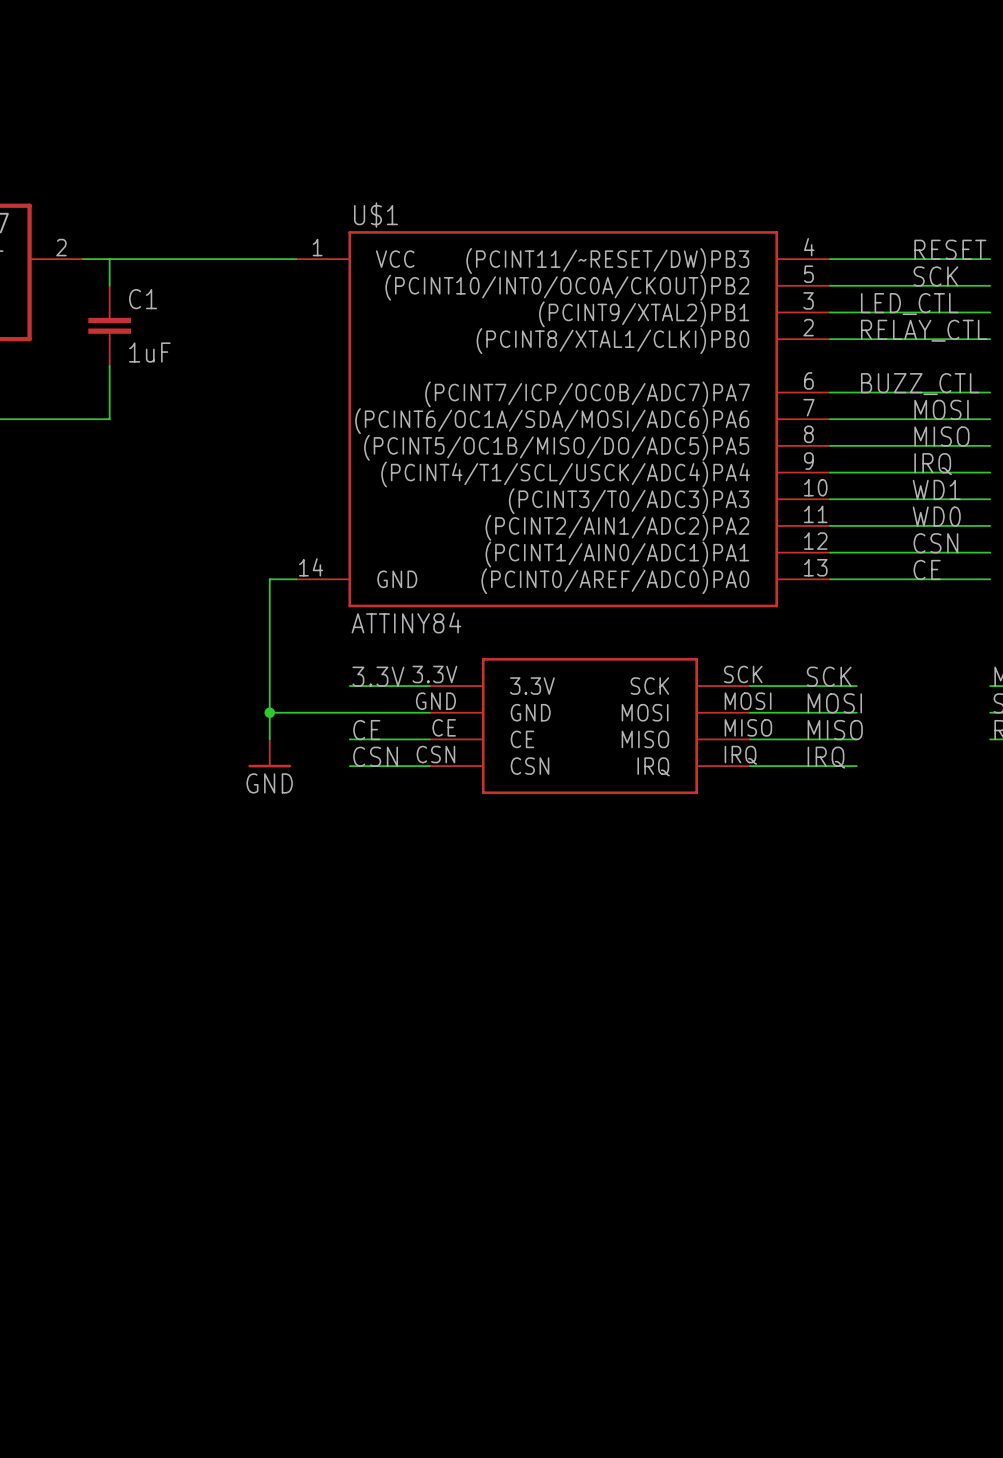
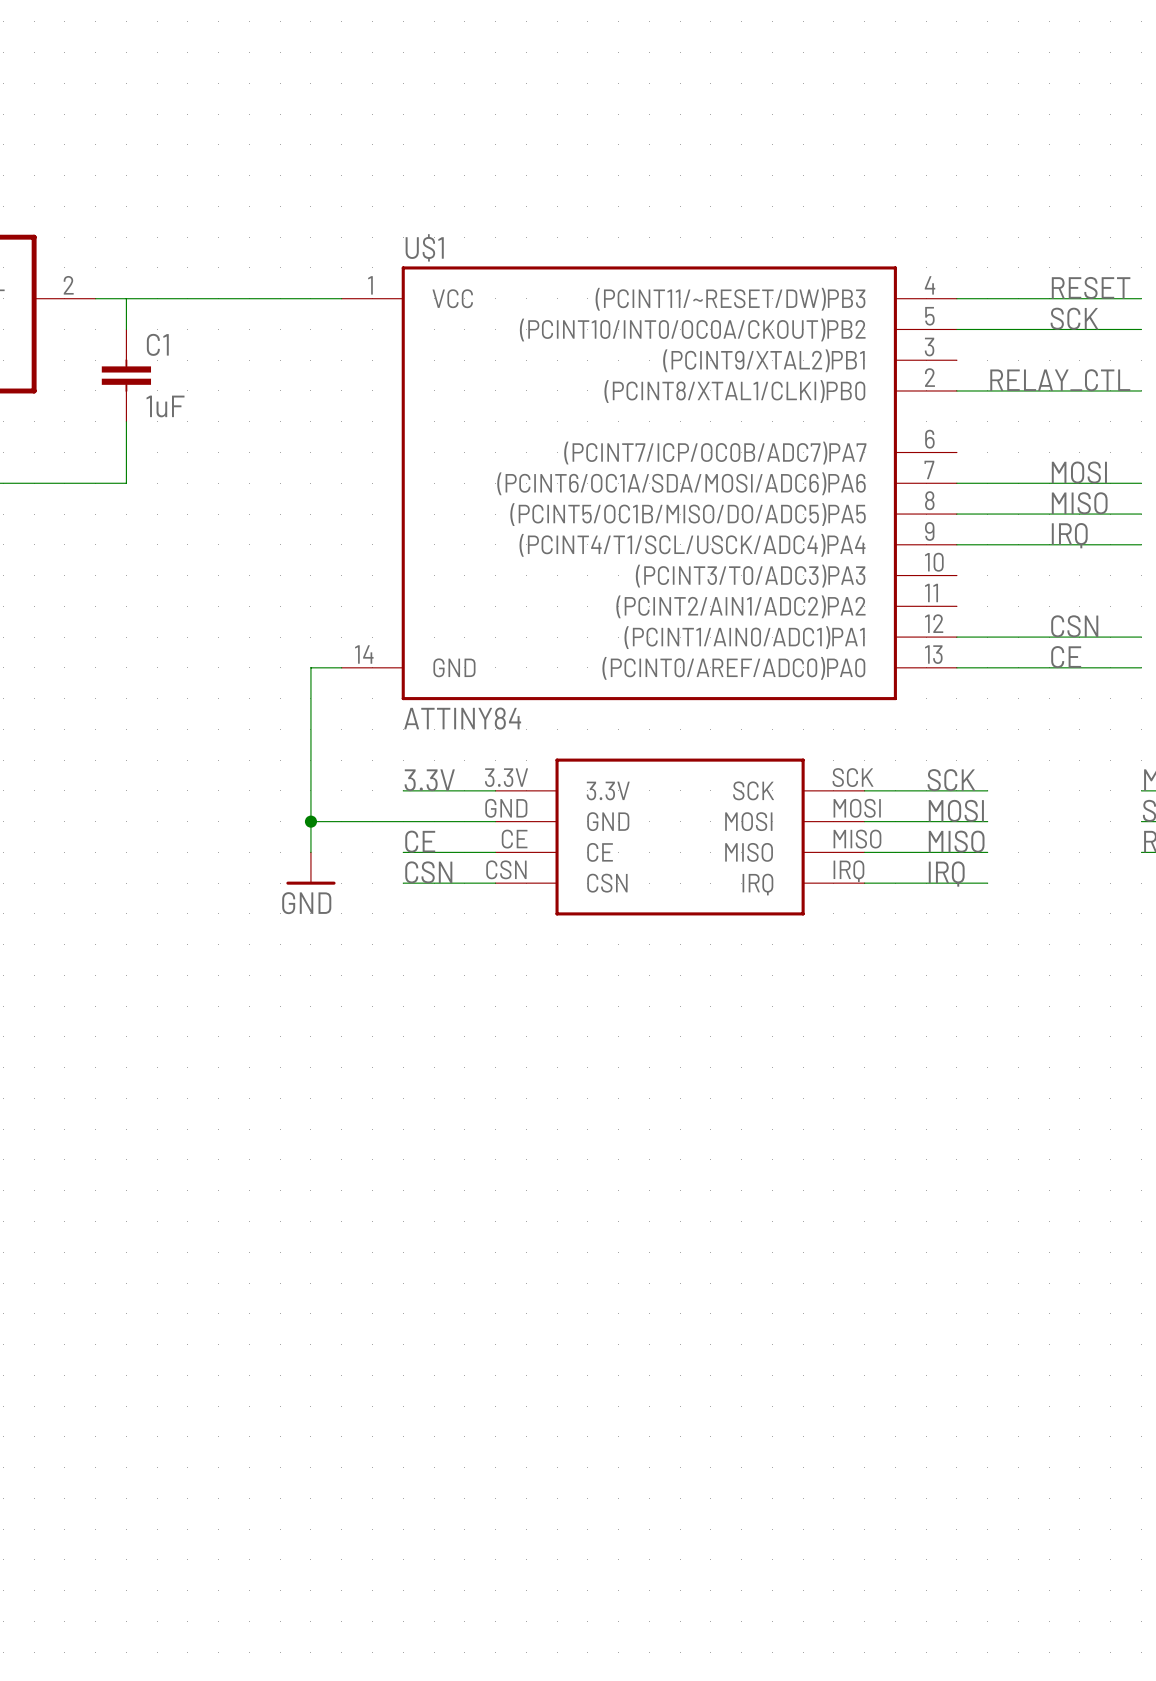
label: LED_CTL (909, 304) -> none
wire: (830, 312) (990, 312) -> none
label: BUZZ_CTL (920, 384) -> none
wire: (830, 392) (990, 392) -> none
label: WD1 (936, 489) -> none
wire: (830, 499) (990, 499) -> none
label: WD0 (936, 516) -> none
wire: (830, 525) (990, 525) -> none

